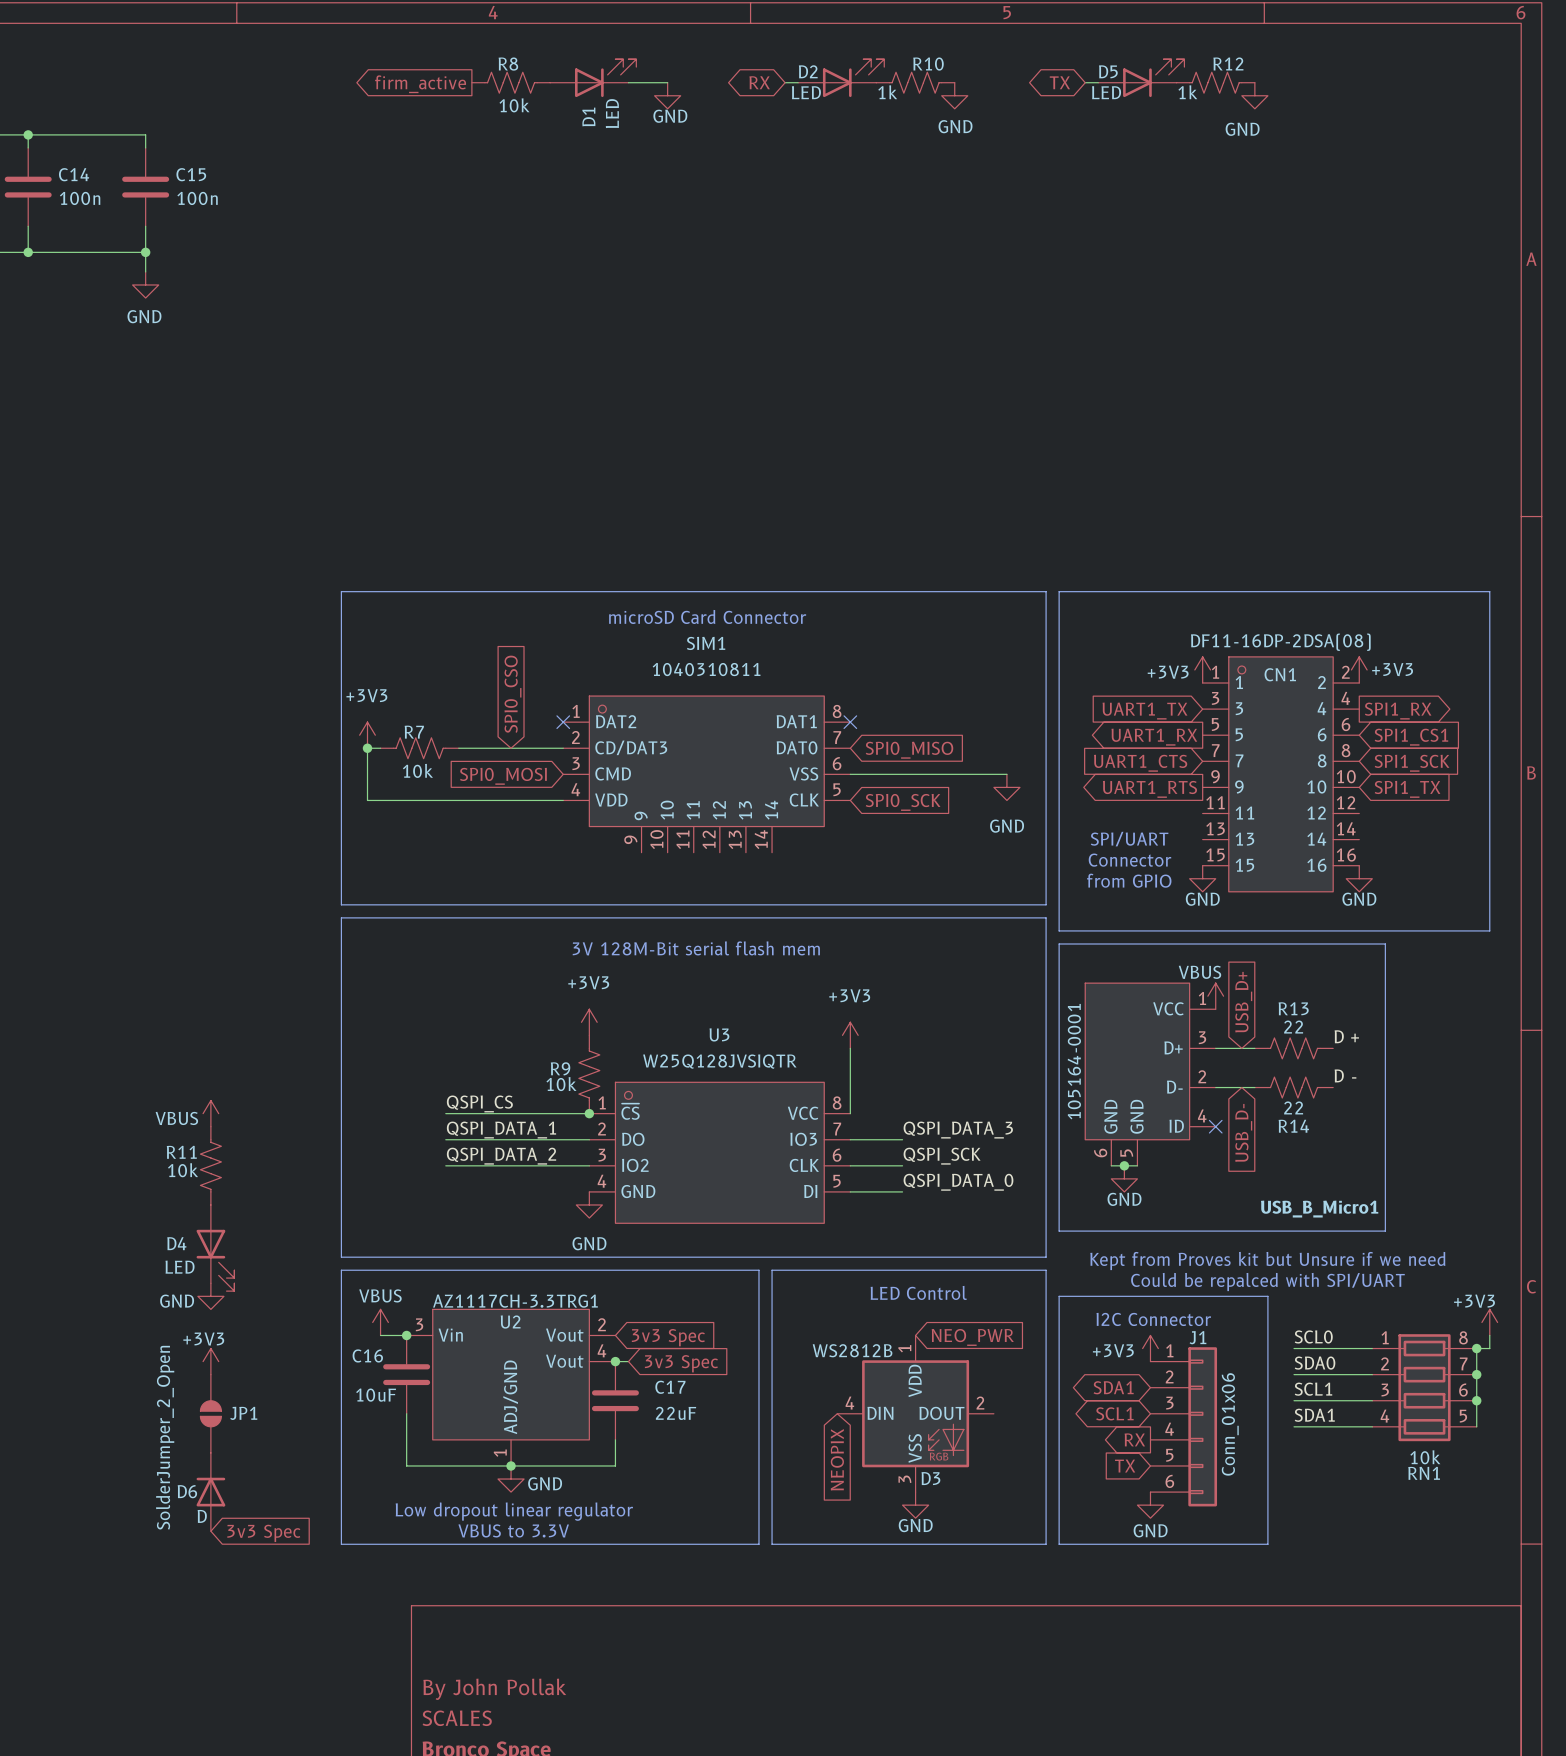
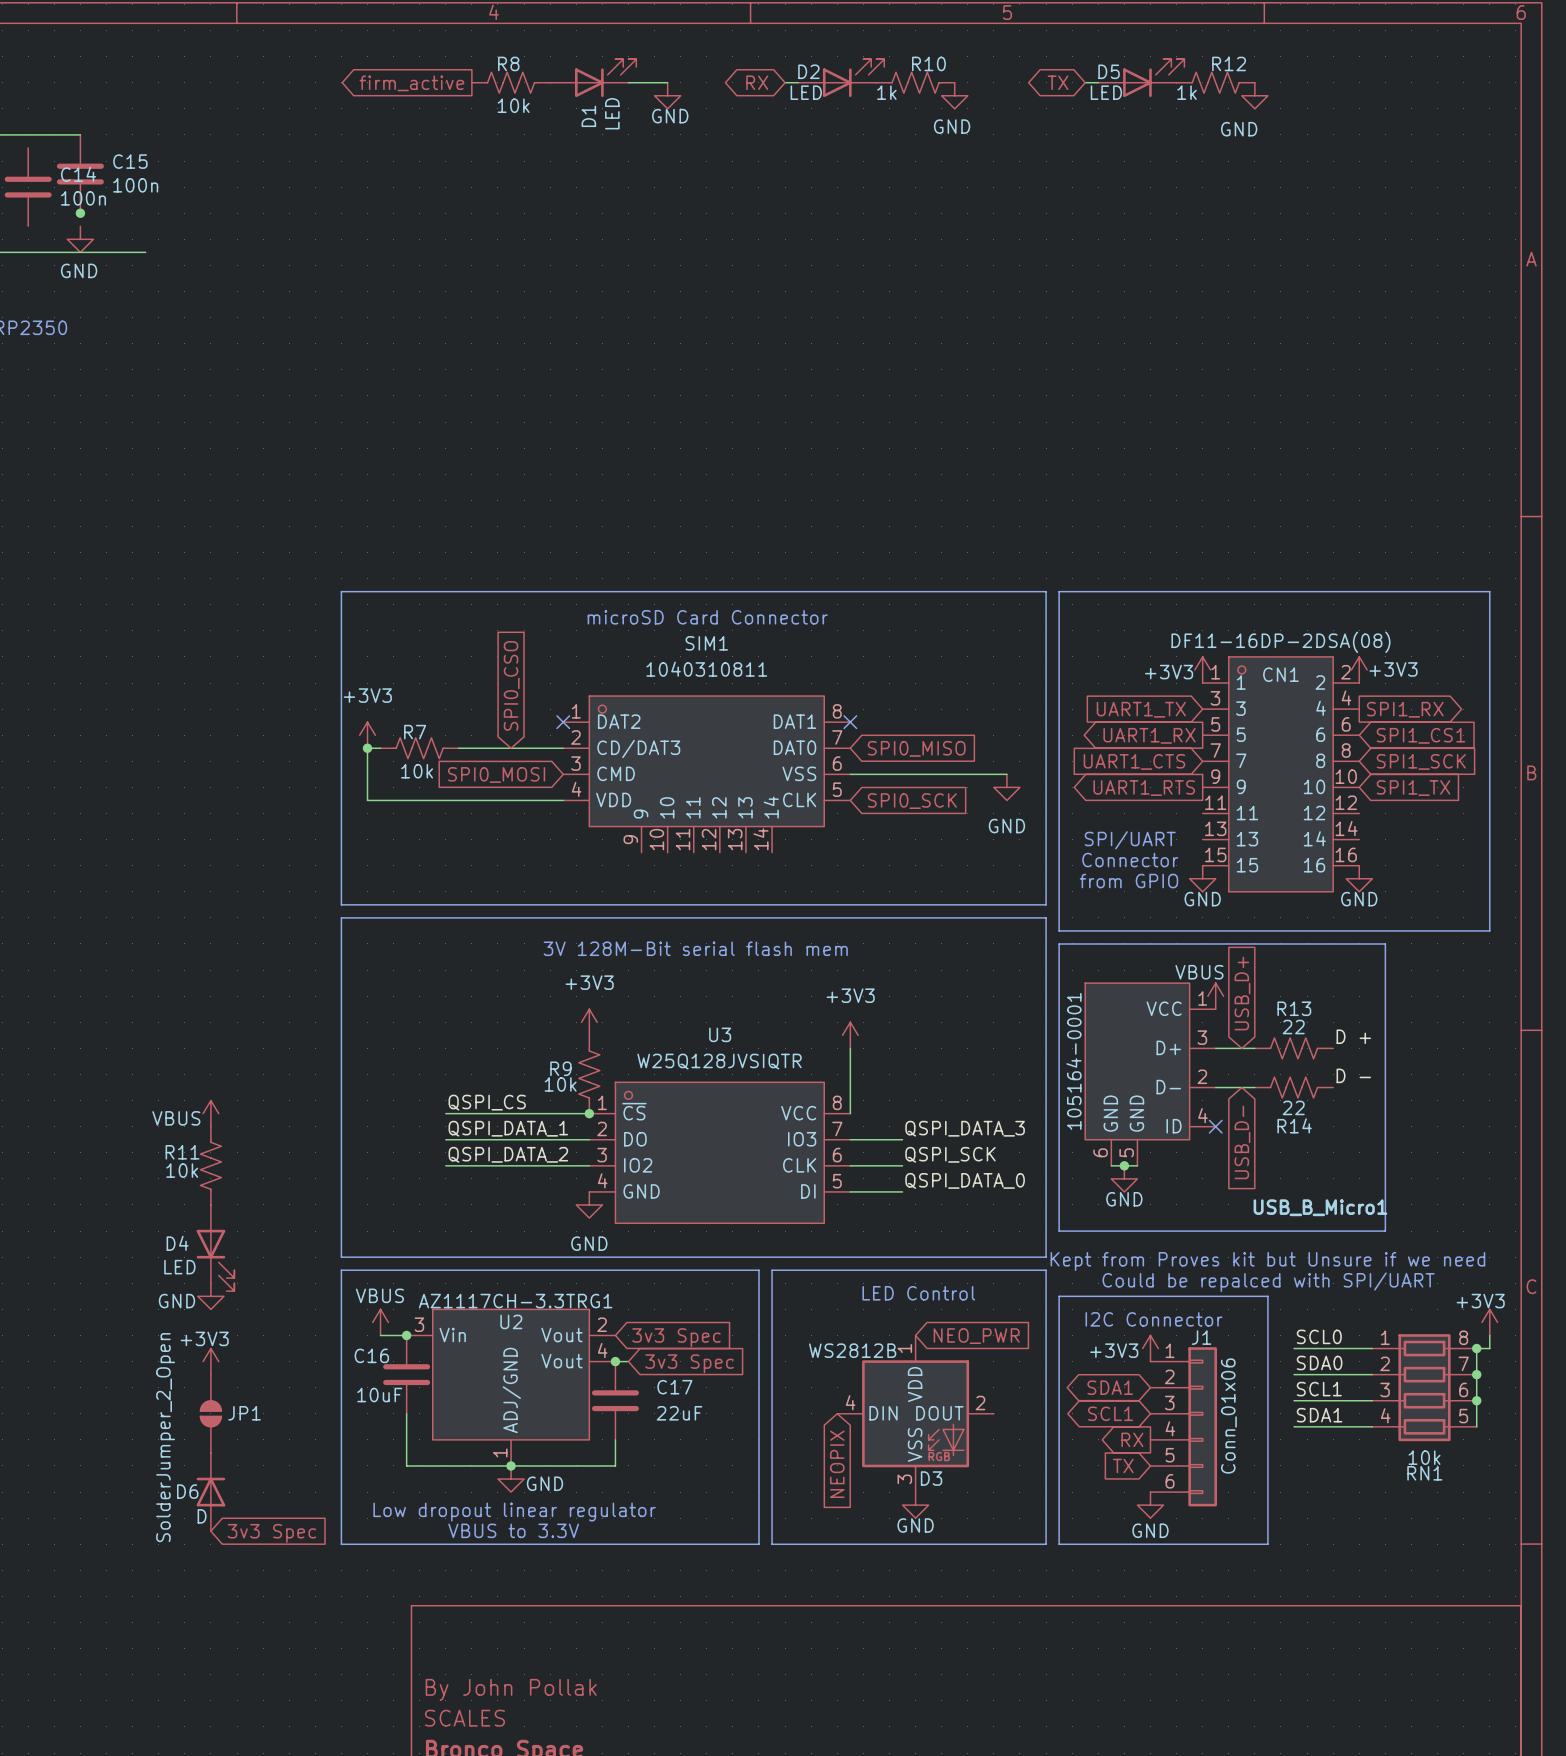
wire: (28, 134) (28, 147) -> none
junction: (28, 134) -> none
wire: (80, 134) (145, 134) (145, 147) -> none
C15 position: (145, 187) -> (80, 174)
junction: none -> (80, 213)
wire: (28, 226) (28, 252) -> none
wire: (145, 226) (145, 271) -> none
junction: (28, 252) -> none
junction: (145, 252) -> none
power symbol position: GND (145, 284) -> GND (80, 239)

